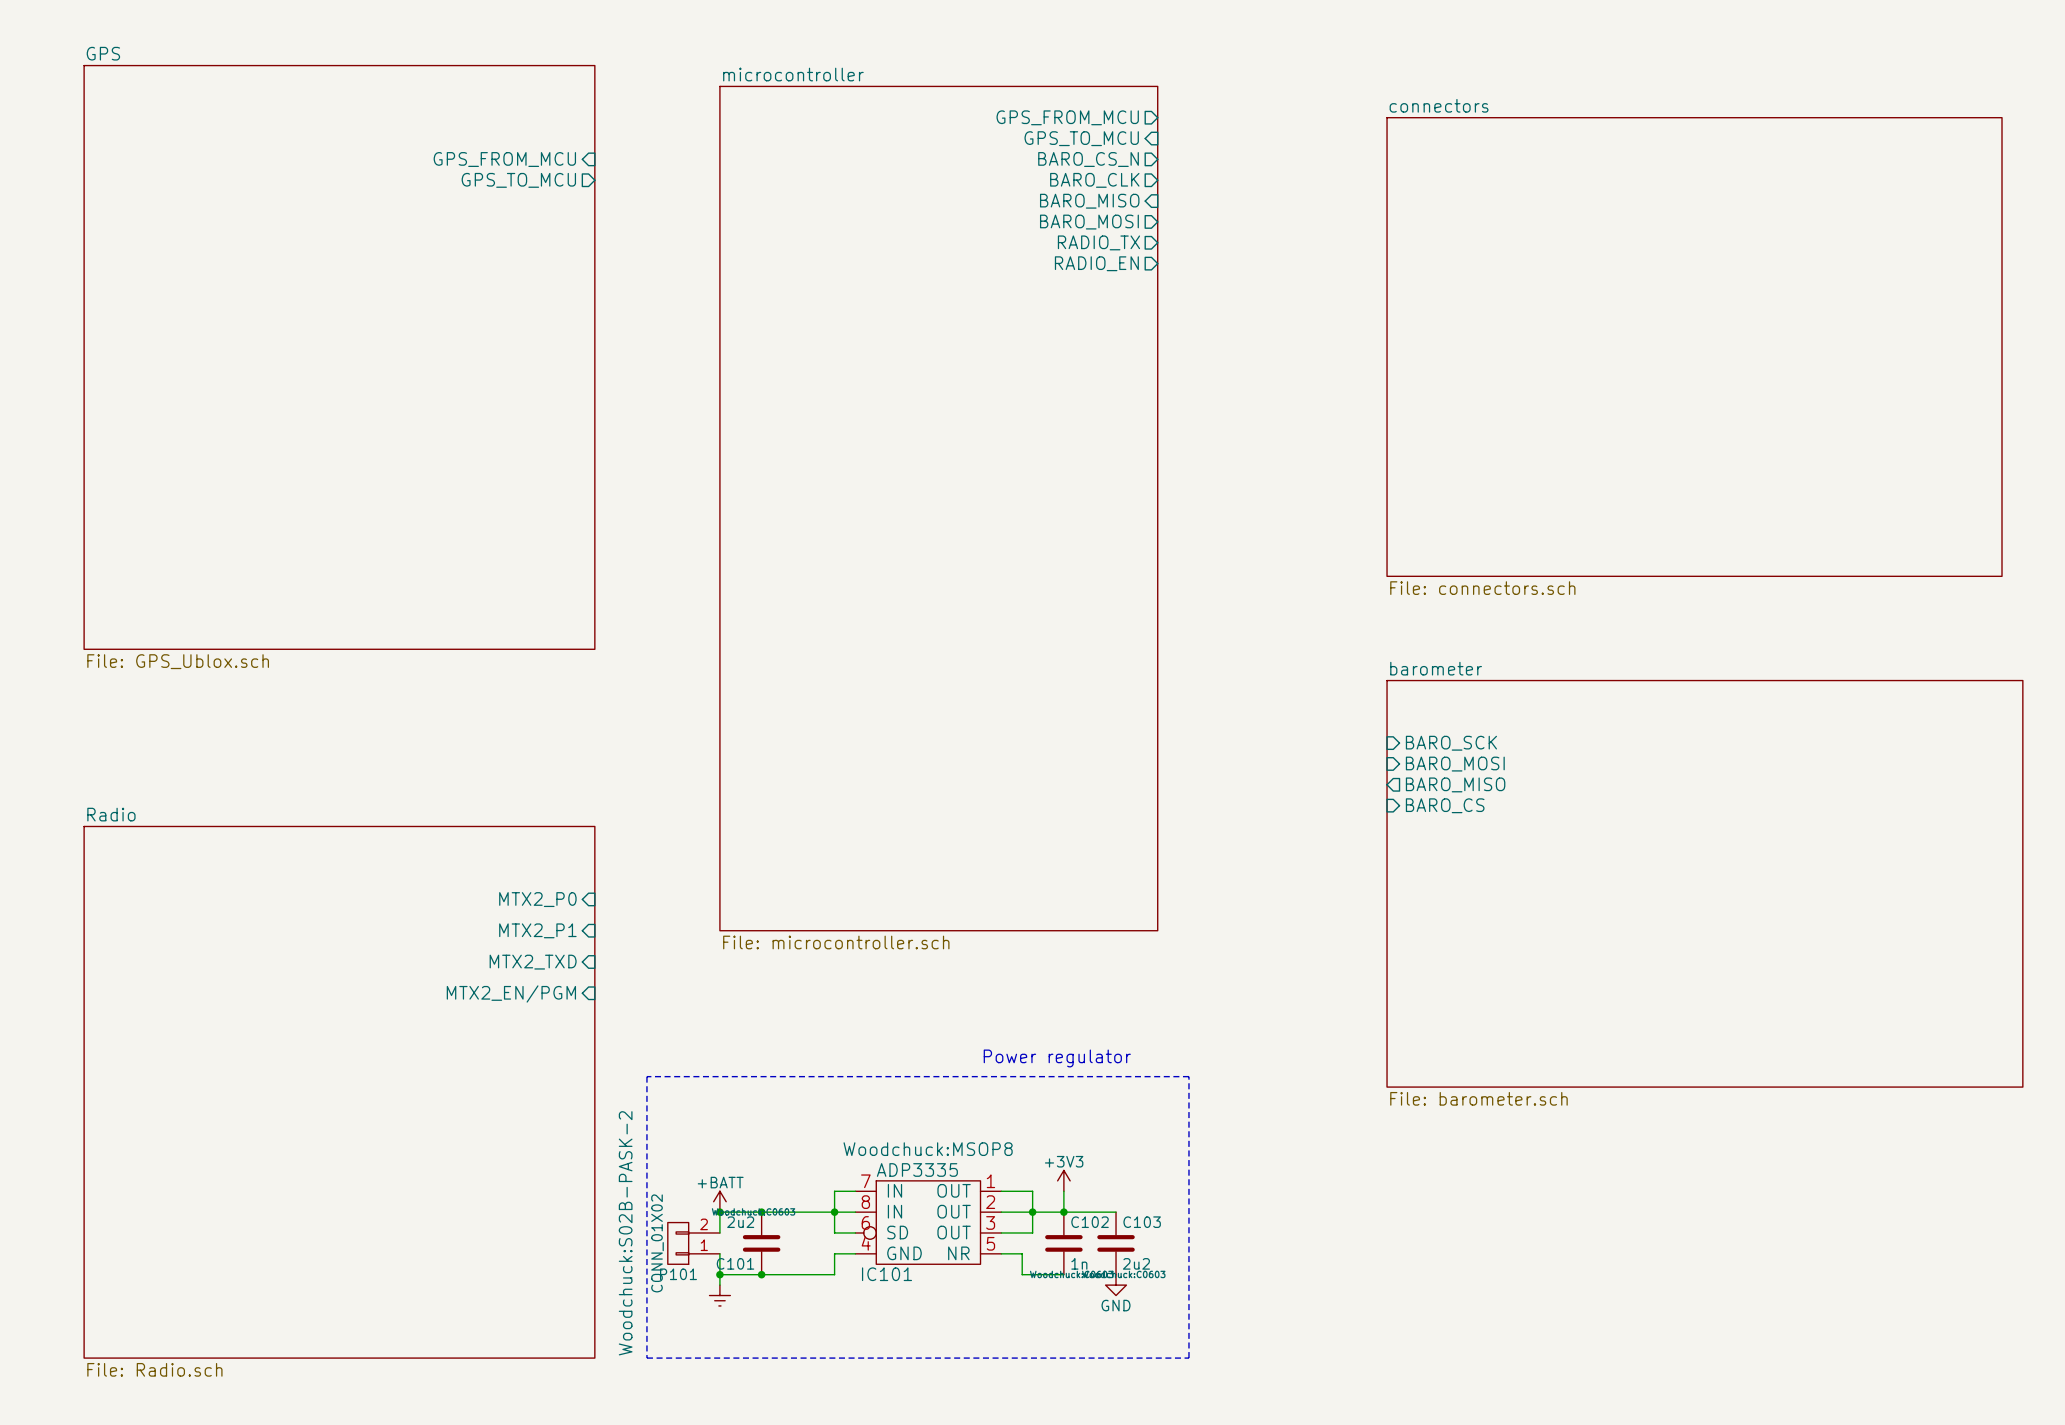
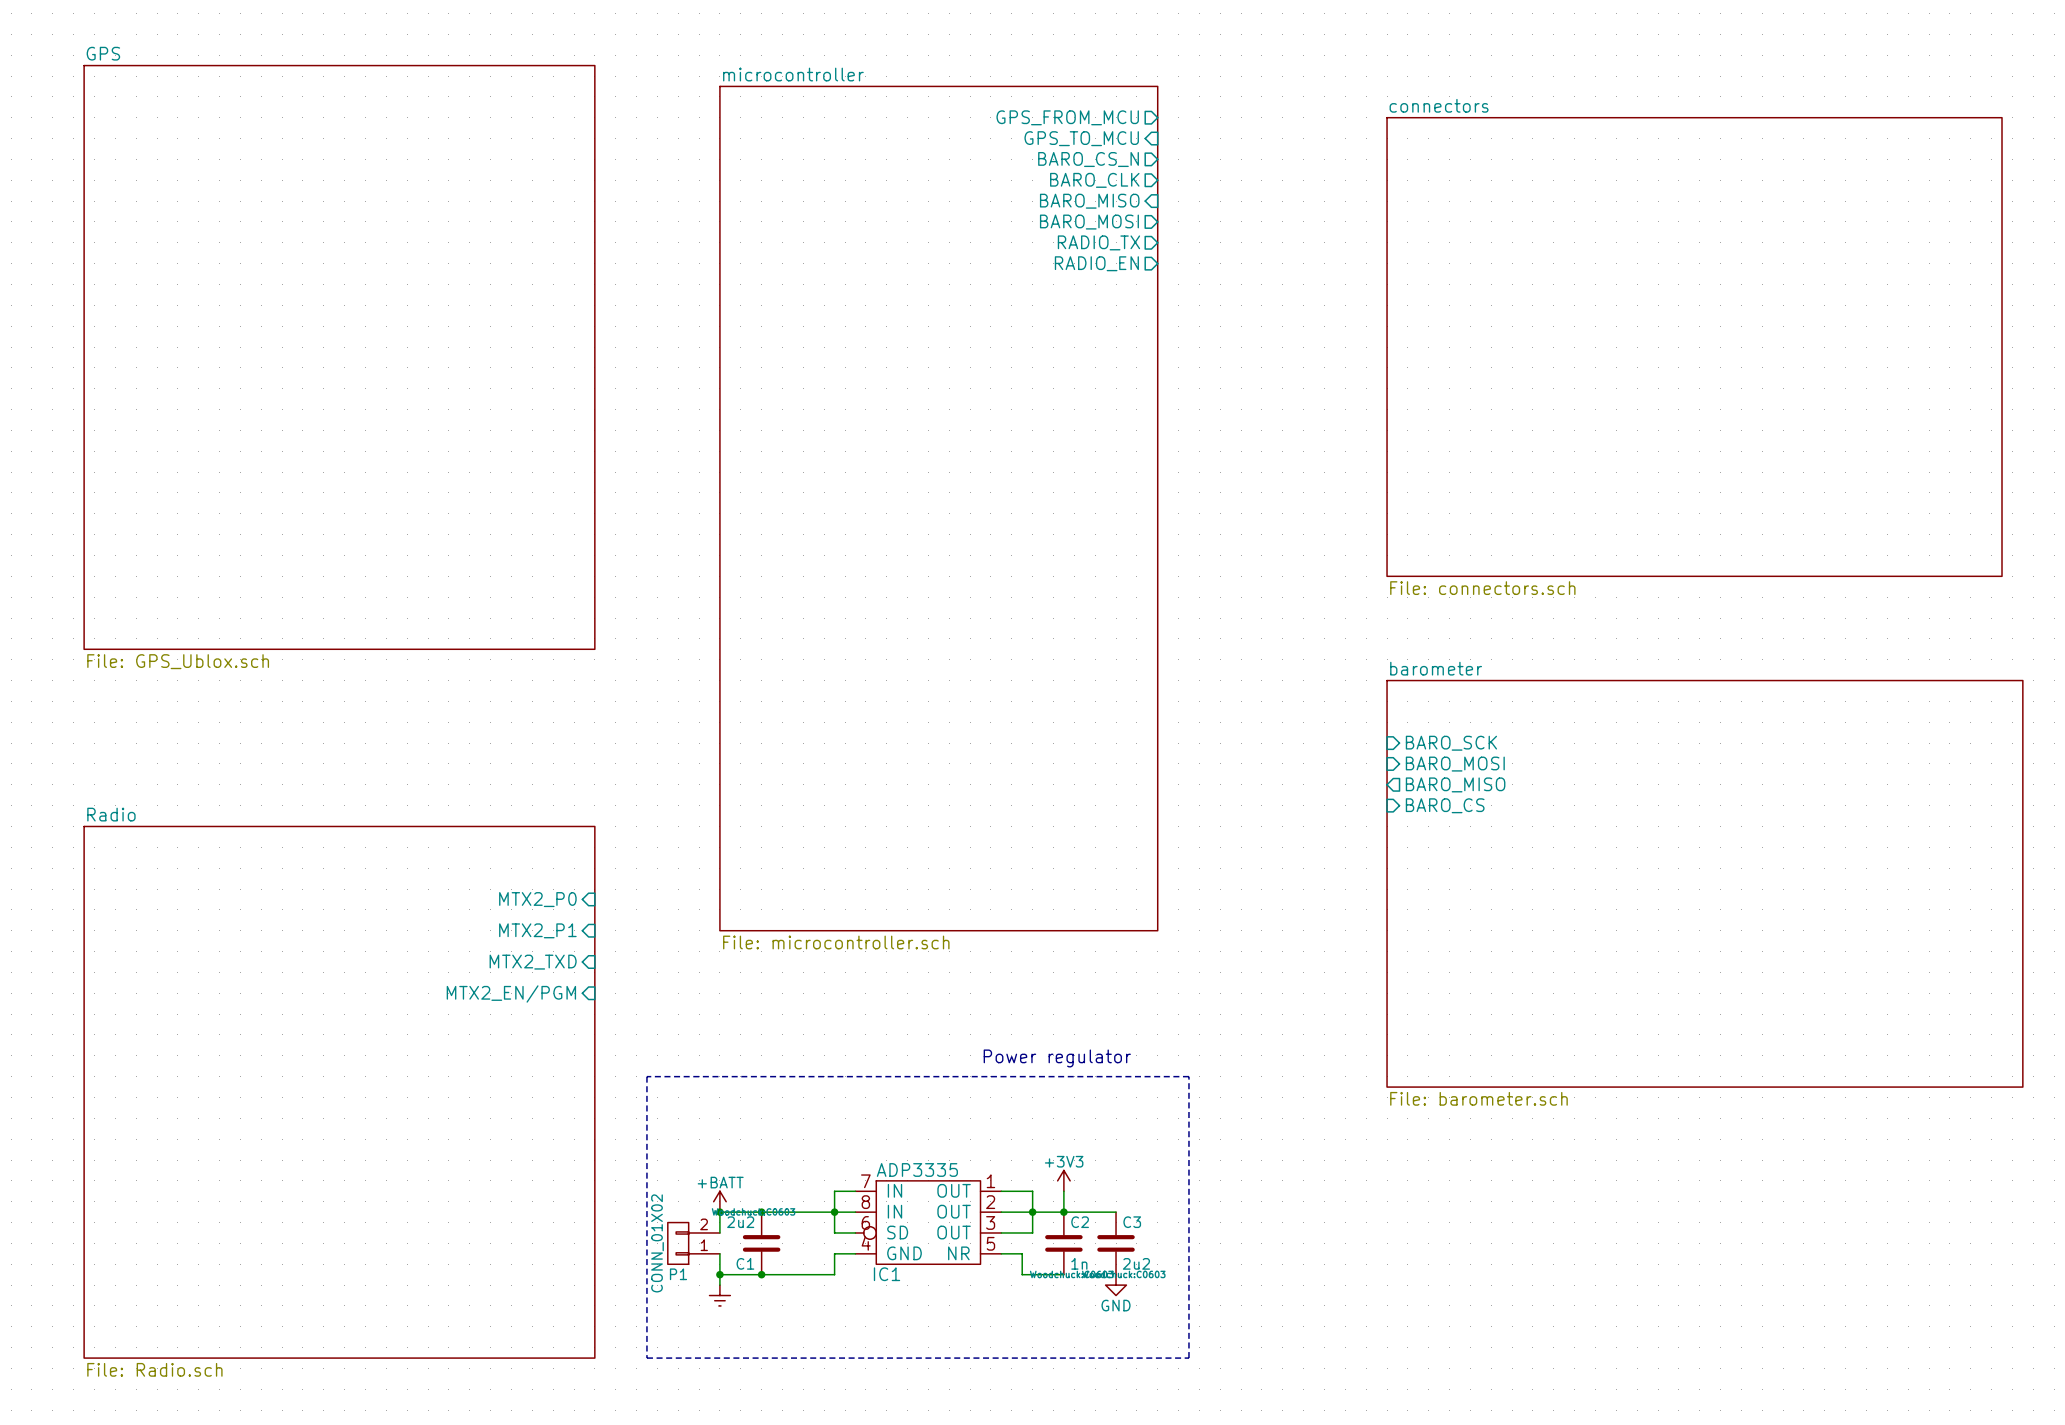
sheet pin: GPS_FROM_MCU (504, 159) -> none
sheet pin: GPS_TO_MCU (518, 180) -> none
IC101 text: Woodchuck:MSOP8 (928, 1149) -> none
C102 name: C102 (1090, 1222) -> C2 (1080, 1222)
C103 name: C103 (1142, 1222) -> C3 (1132, 1222)
P101 text: Woodchuck:S02B-PASK-2 (625, 1233) -> none
C101 name: C101 (735, 1263) -> C1 (745, 1263)
P101 name: P101 (678, 1274) -> P1 (678, 1274)
IC101 name: IC101 (887, 1274) -> IC1 (887, 1274)

